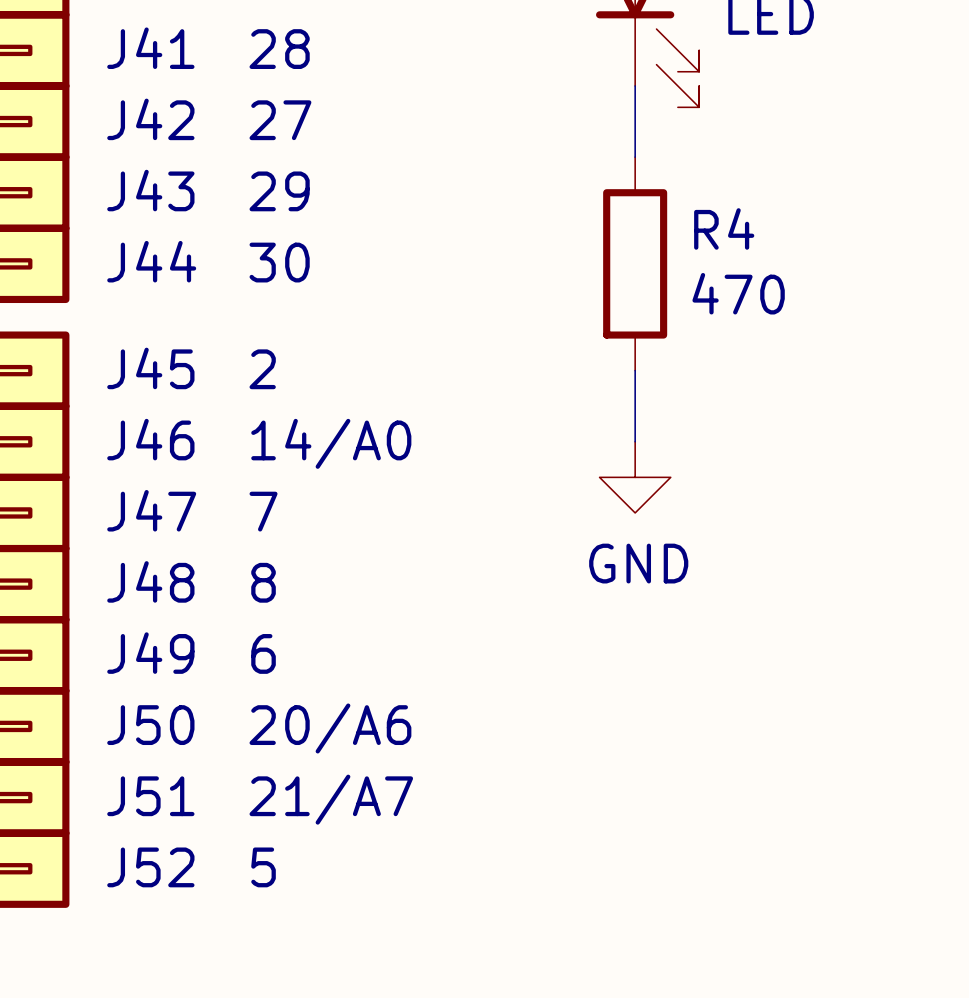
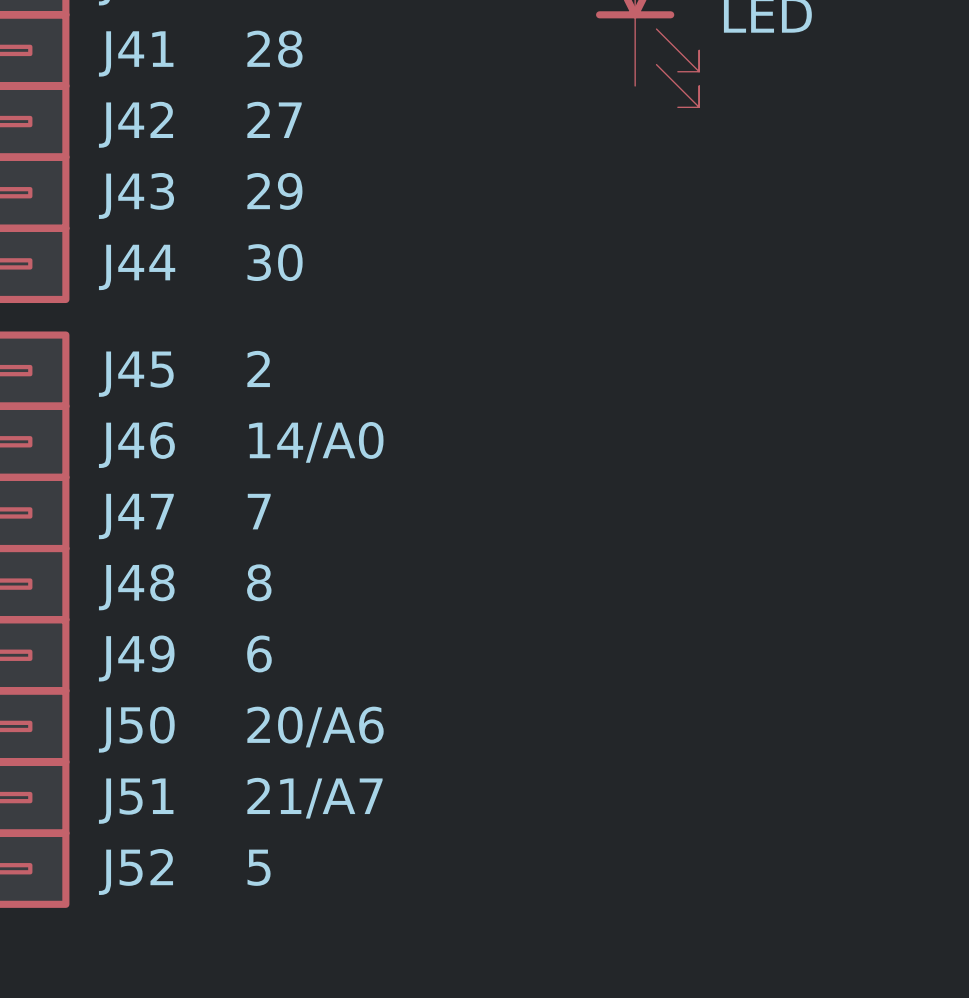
wire: (635, 85) (635, 157) -> none
R4: 470 (635, 263) -> none
wire: (635, 370) (635, 441) -> none
power symbol: GND (635, 477) -> none

